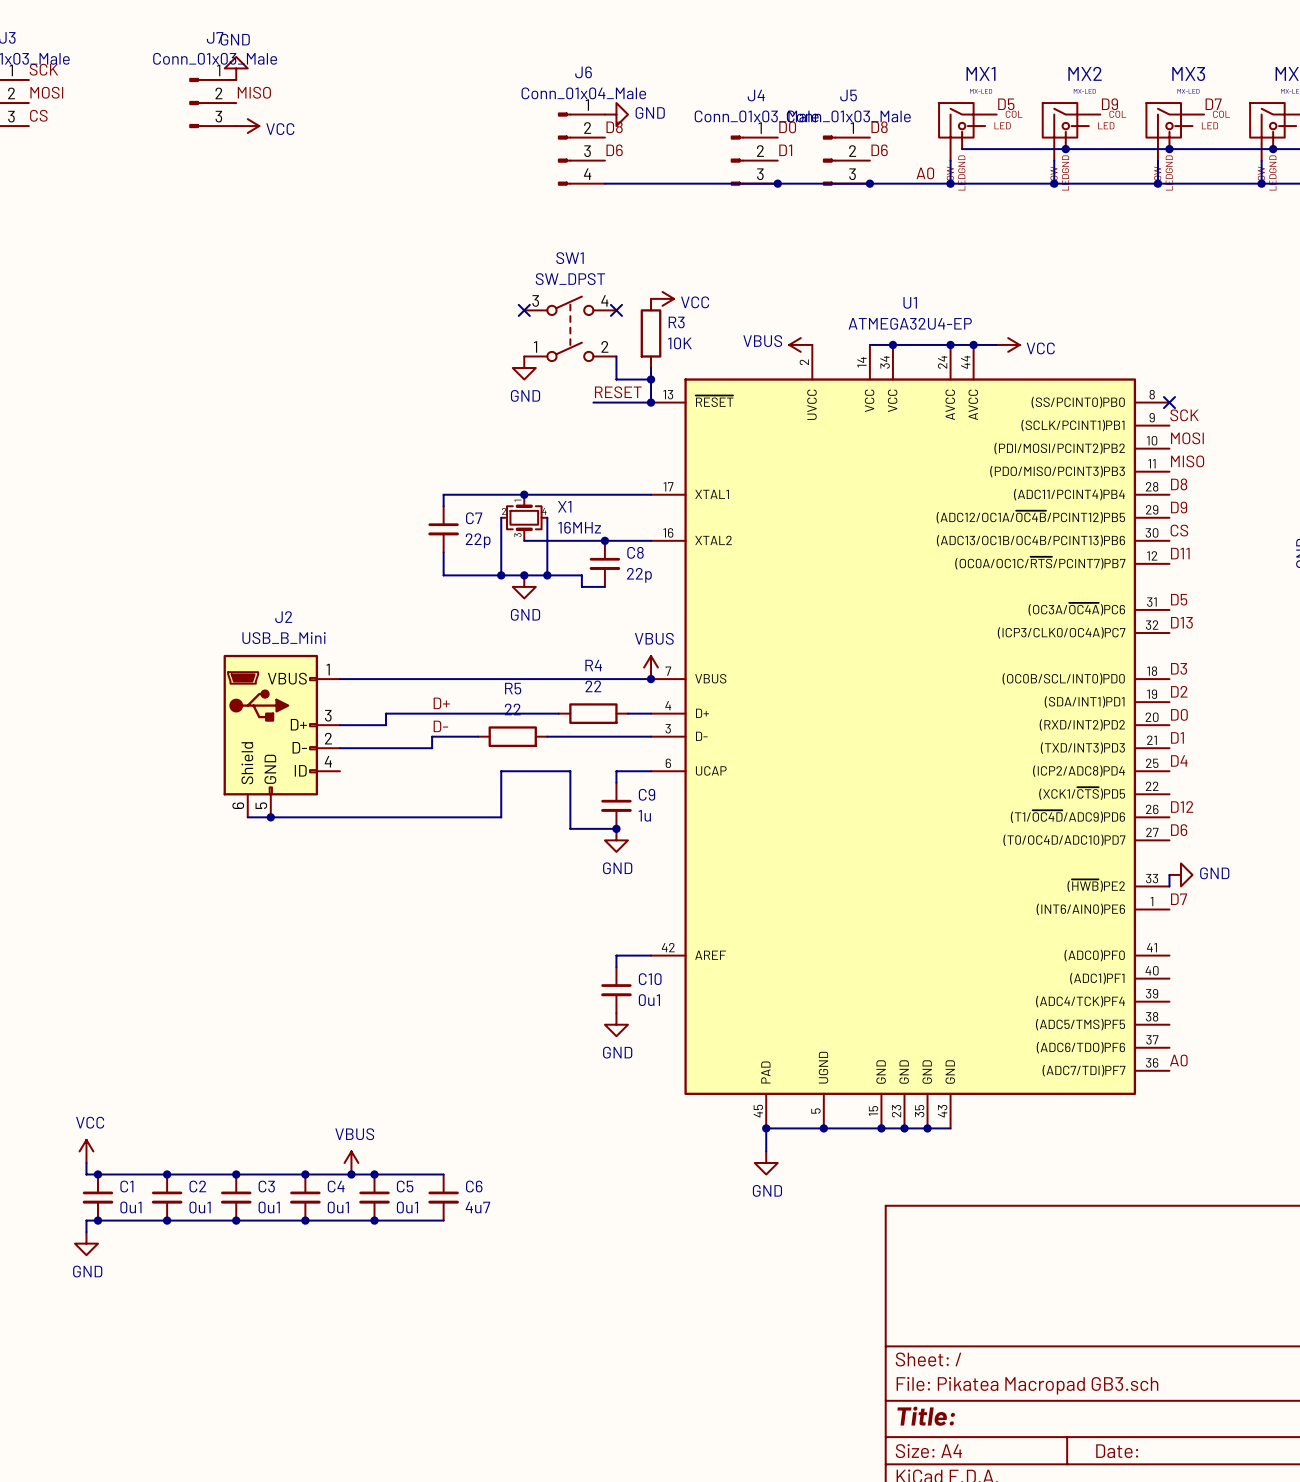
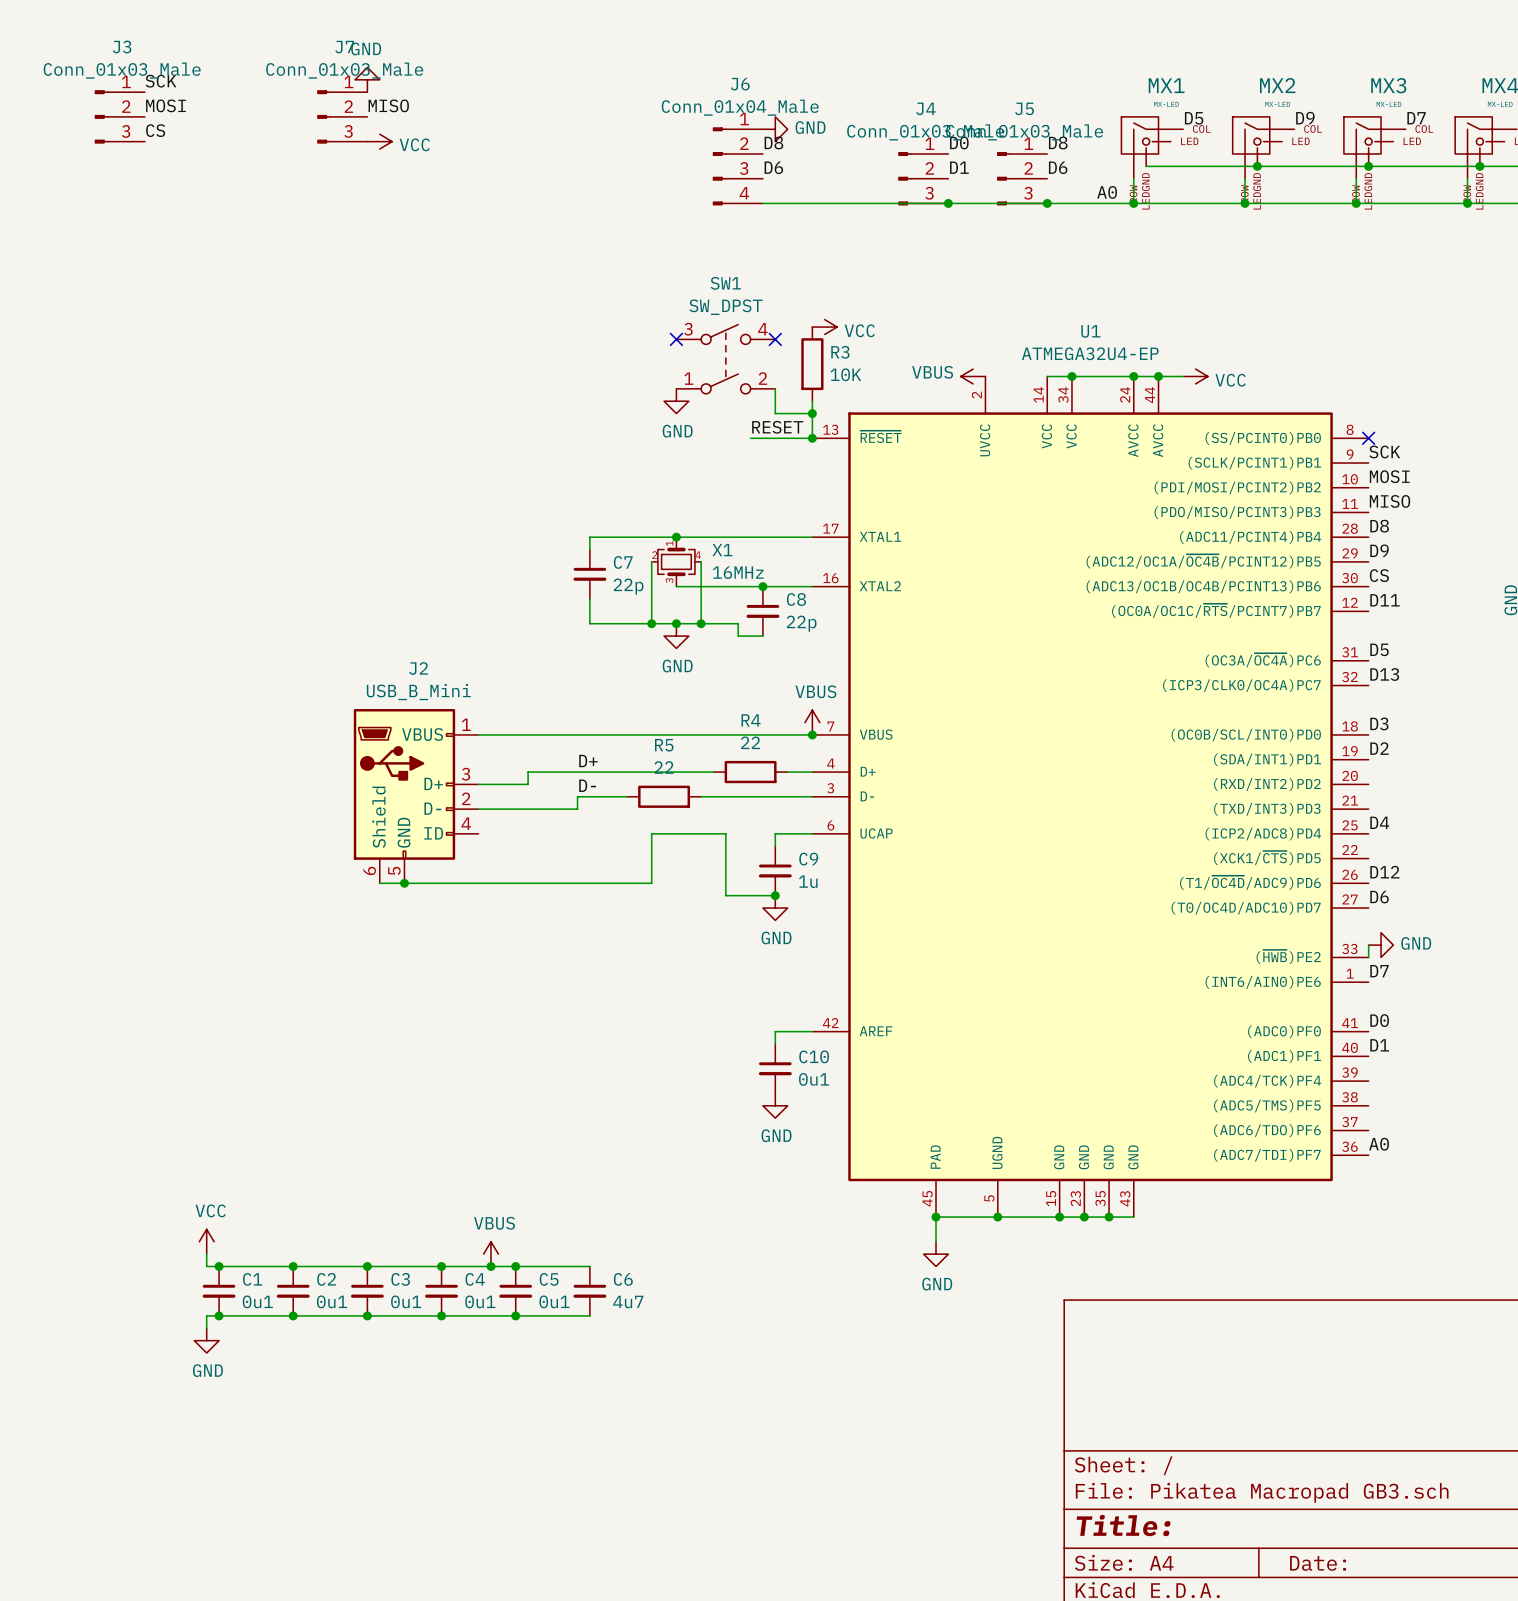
label: D0 (1179, 714) -> none
label: D1 (1177, 737) -> none
label: none -> D0 (1379, 1020)
label: none -> D1 (1379, 1045)

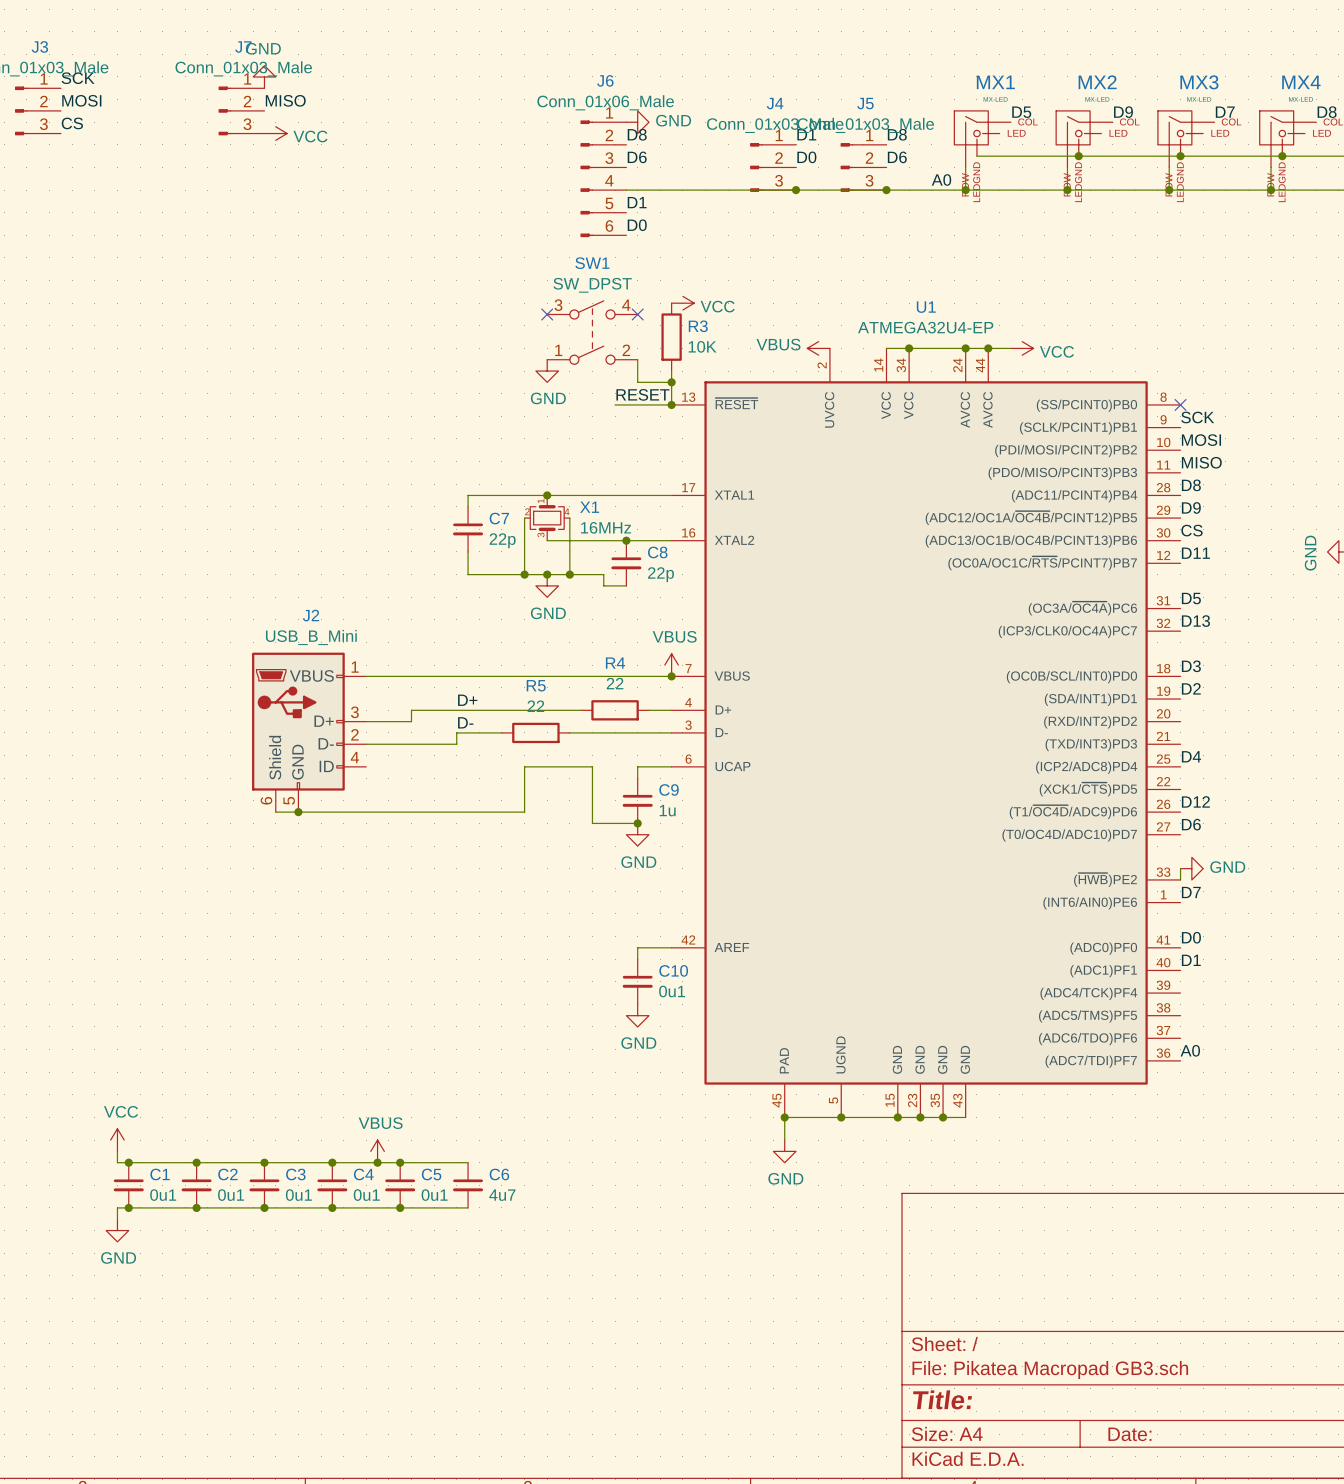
J6 value: Conn_01x04_Male (740, 107) -> Conn_01x06_Male (605, 102)
J6 symbol: [712, 127, 763, 206] -> [580, 120, 627, 238]
label: D0 (959, 142) -> D1 (806, 134)
label: D1 (959, 167) -> D0 (806, 157)
label: none -> D1 (637, 202)
label: none -> D0 (637, 225)

